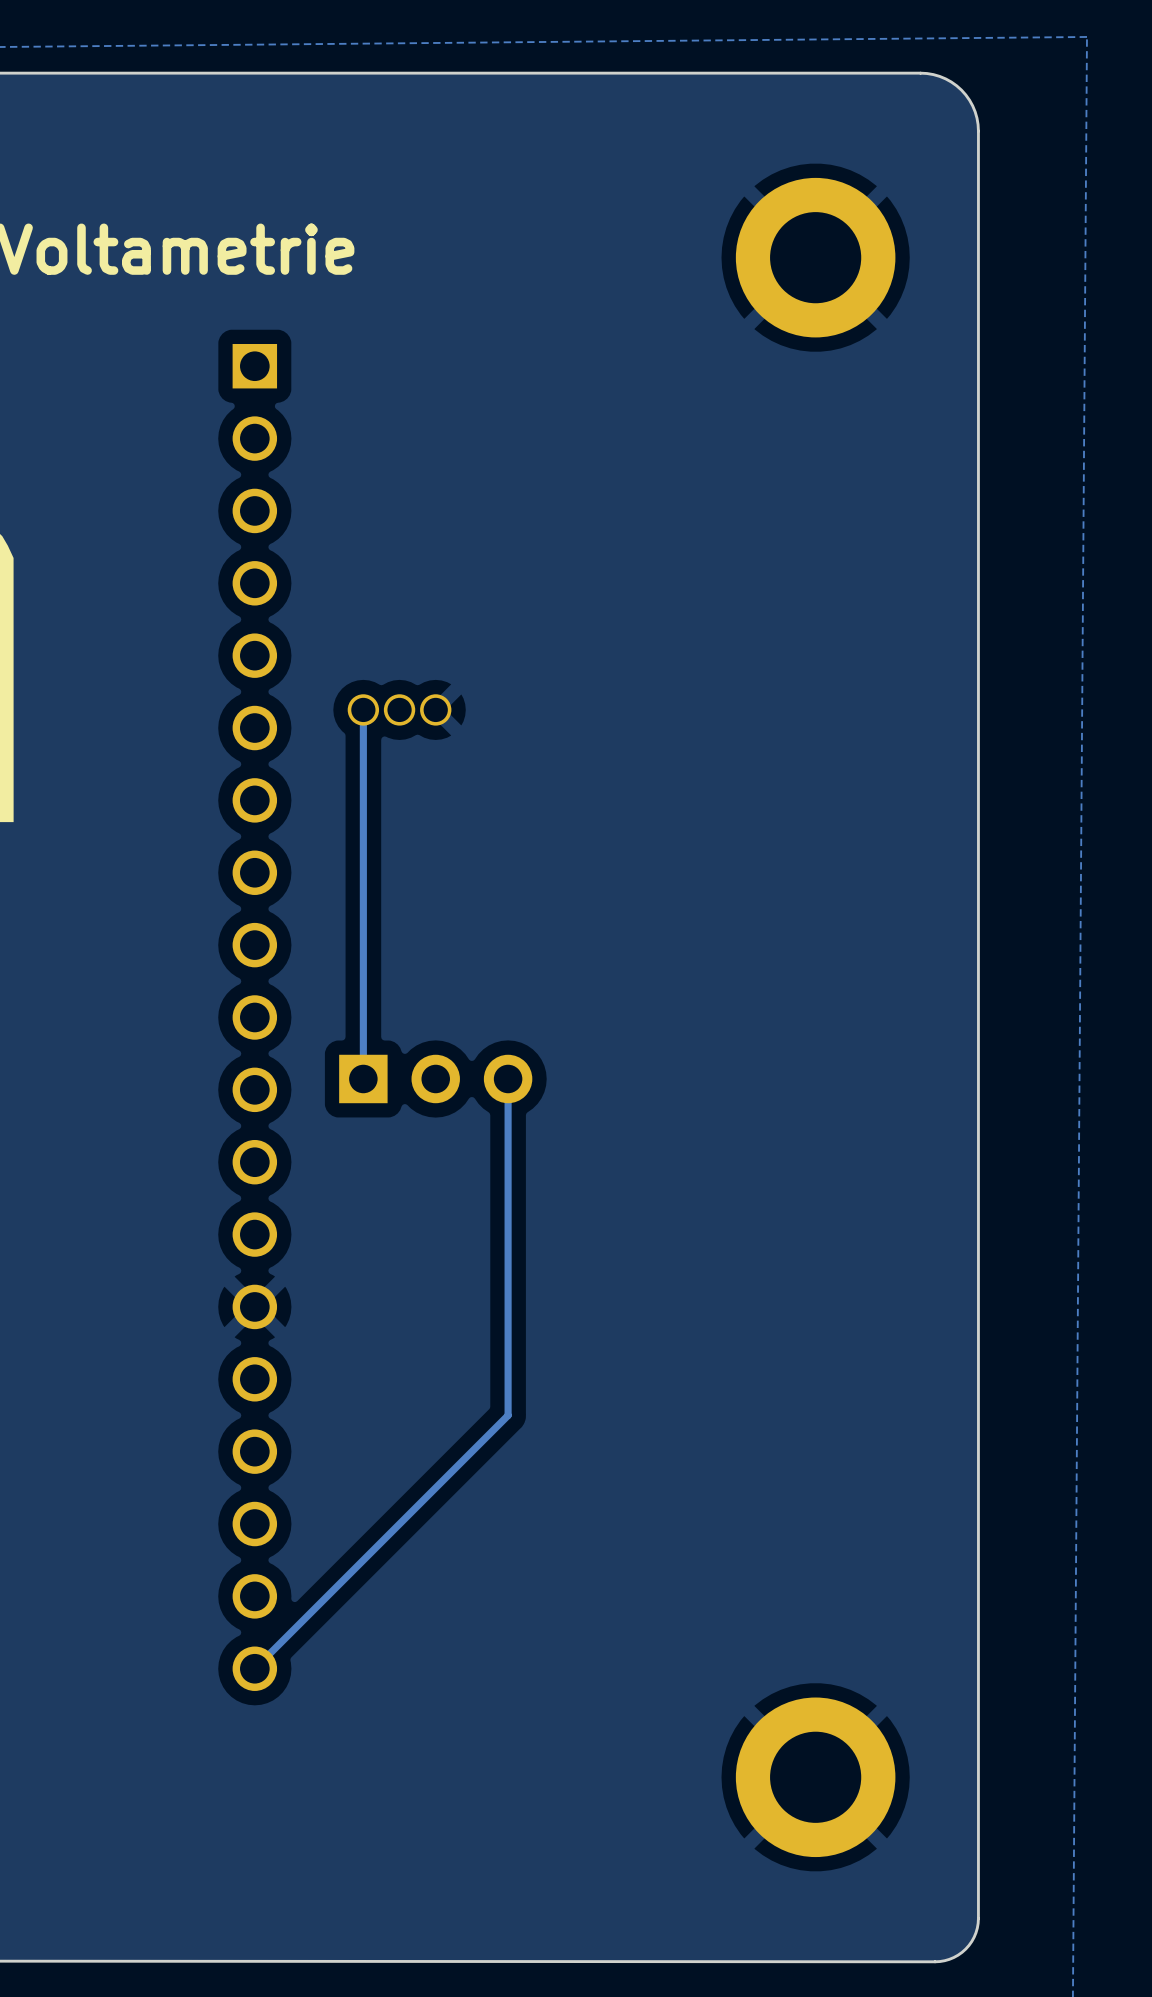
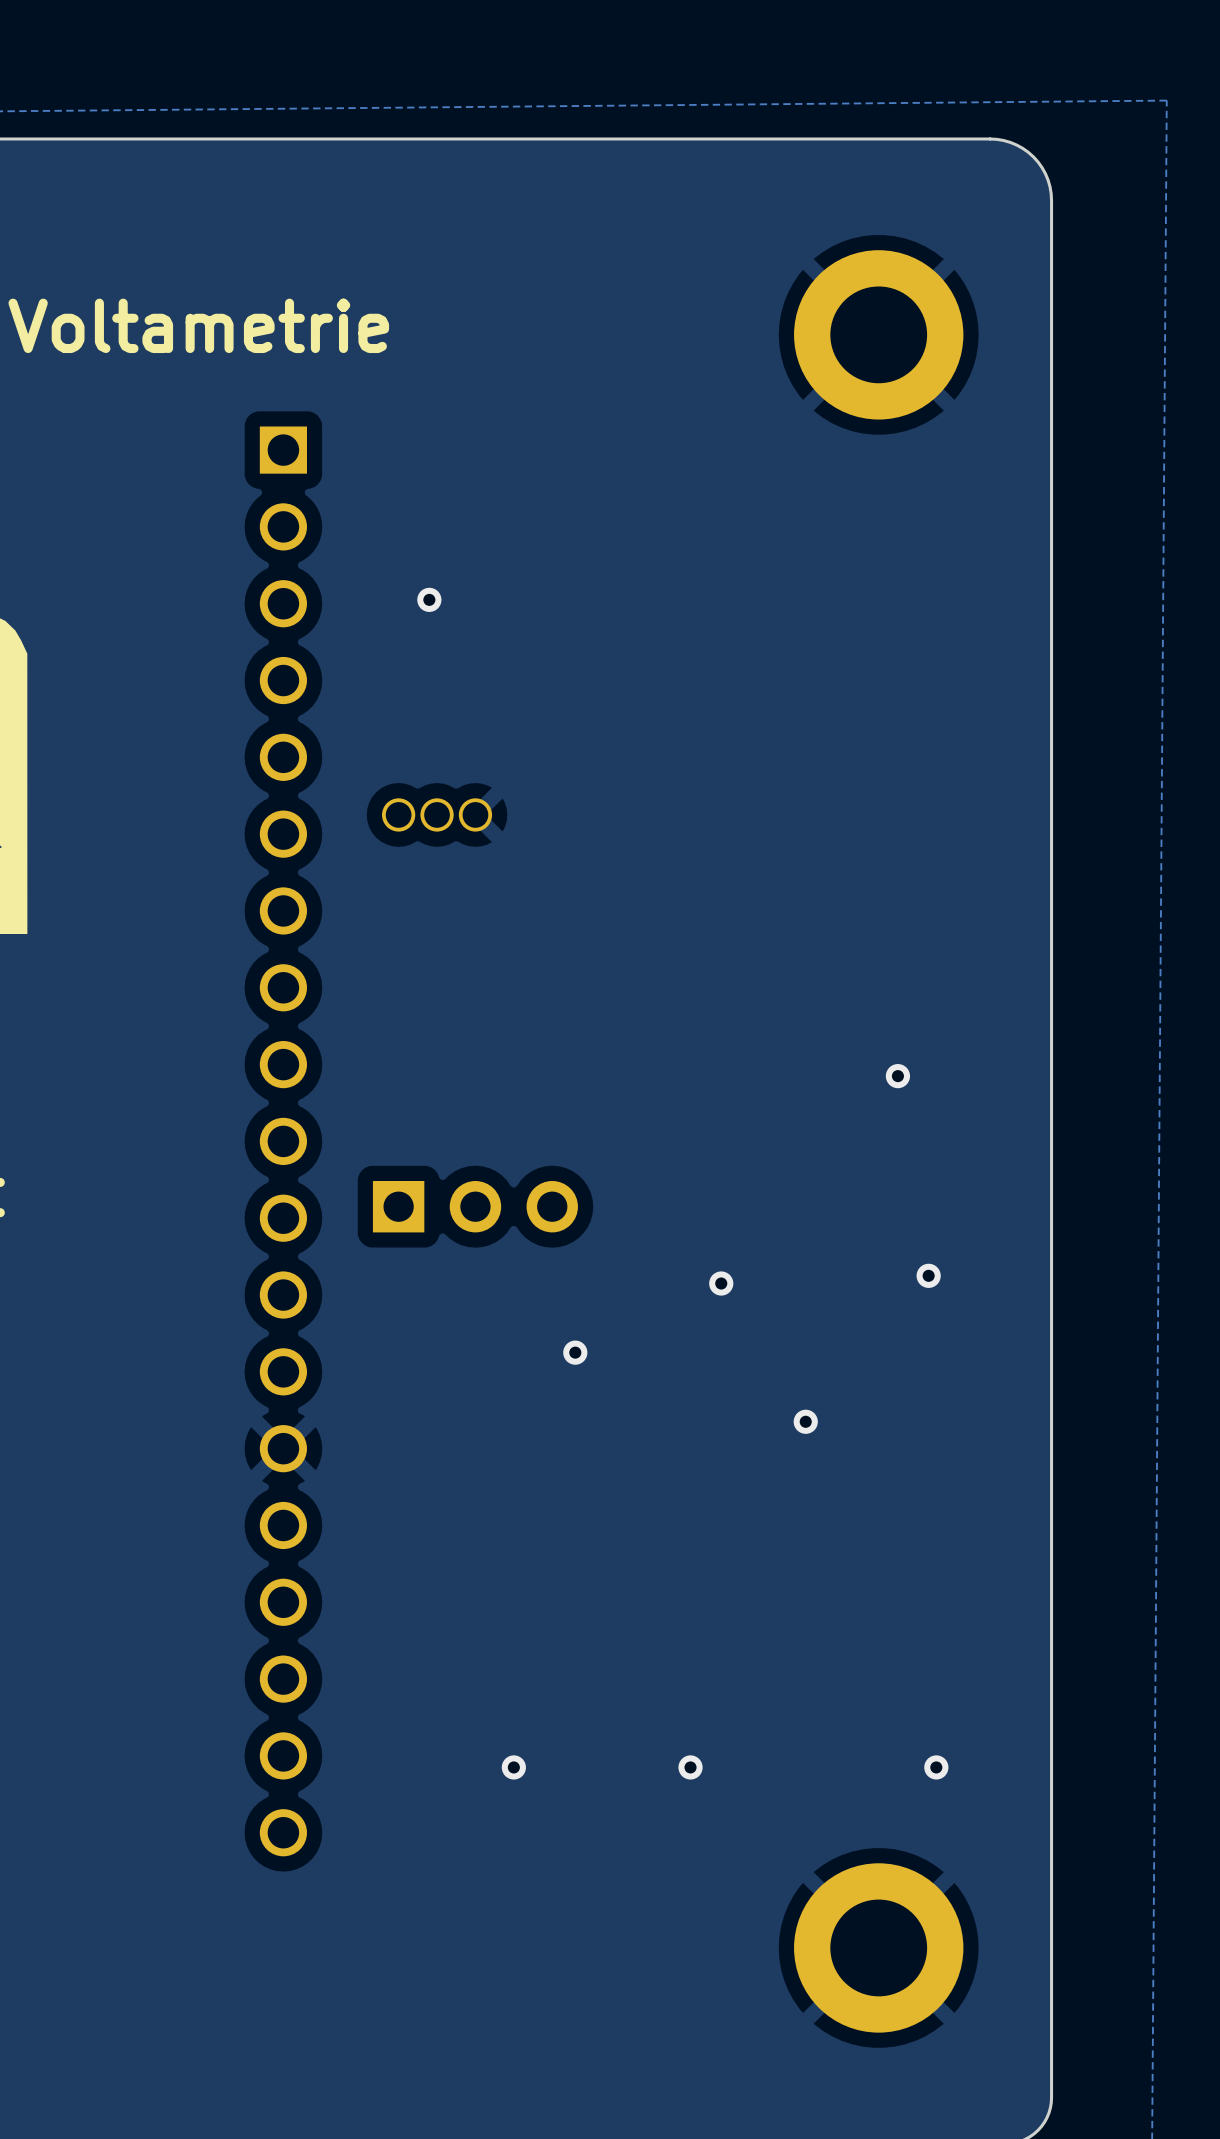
via: none -> (429, 599)
track: (363, 709) (363, 1078) -> none
via: none -> (897, 1076)
track: (508, 1078) (508, 1415) (254, 1668) -> none
via: none -> (928, 1275)
via: none -> (721, 1283)
via: none -> (575, 1352)
via: none -> (805, 1421)
via: none -> (513, 1767)
via: none -> (690, 1767)
via: none -> (936, 1767)

